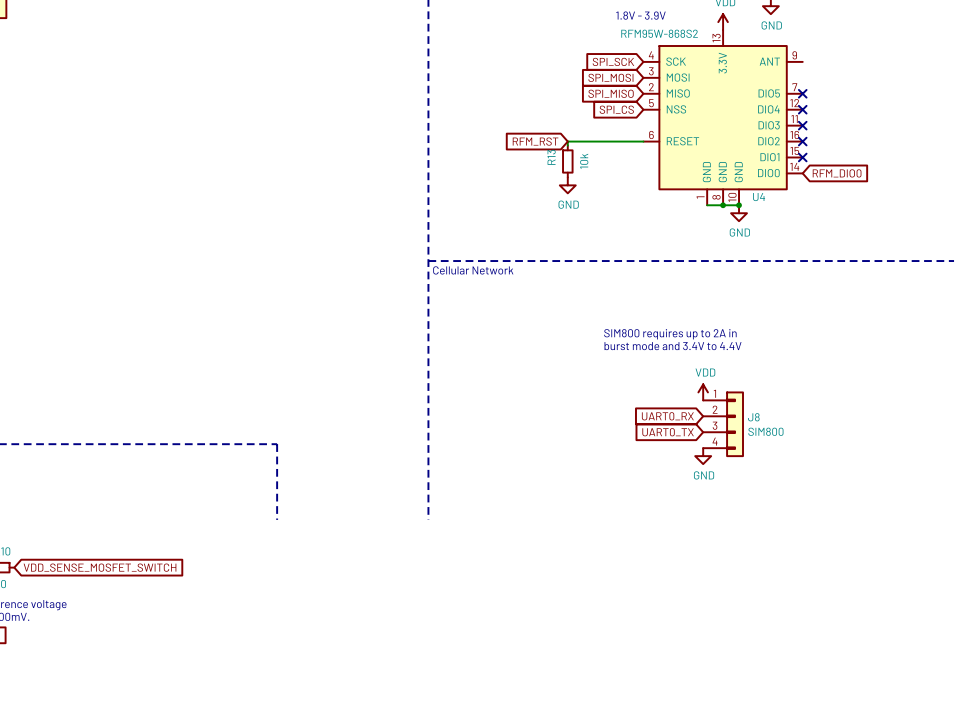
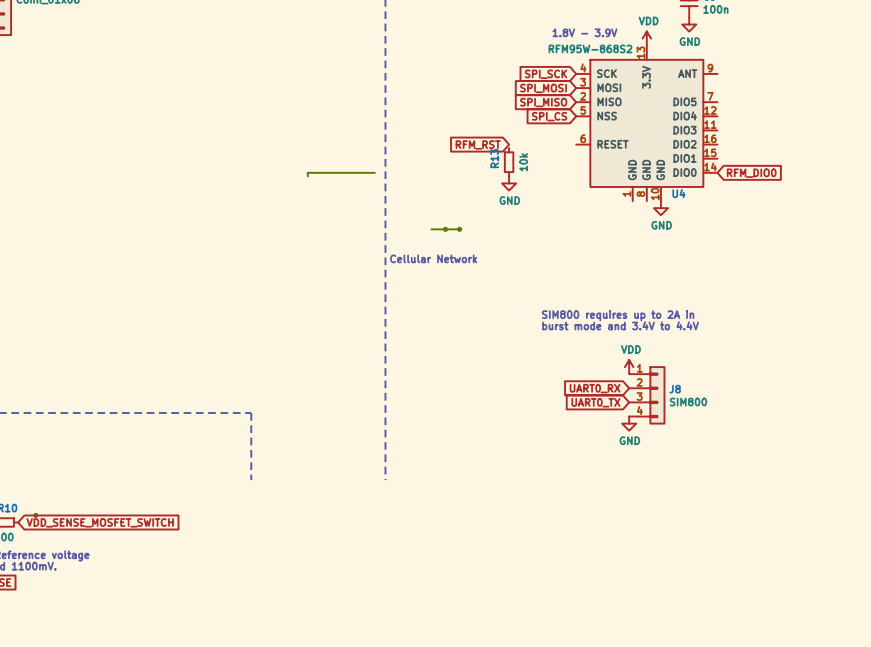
no-connect mark: (802, 93) -> none
no-connect mark: (802, 109) -> none
no-connect mark: (802, 125) -> none
wire: (643, 141) (567, 141) (567, 145) -> none
no-connect mark: (802, 141) -> none
no-connect mark: (802, 157) -> none
wire: none -> (374, 172) (307, 172) (307, 176)
wire: (707, 205) (739, 205) -> none
junction: (723, 205) -> none
junction: (739, 205) -> none
wire: none -> (431, 229) (459, 229)
junction: none -> (445, 229)
junction: none -> (459, 229)
line: (428, 261) (954, 261) -> none
junction: none -> (35, 515)

